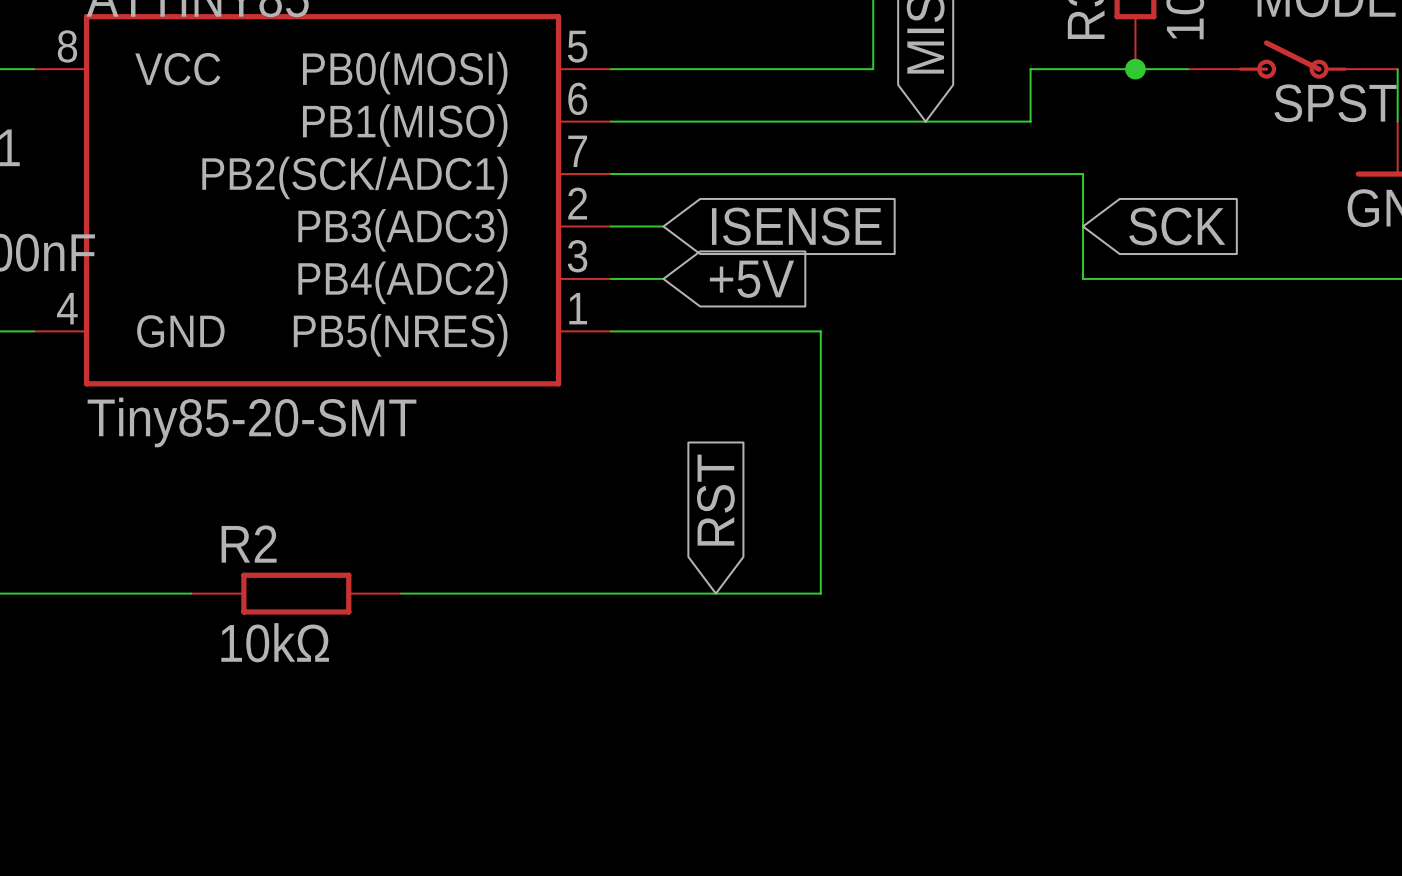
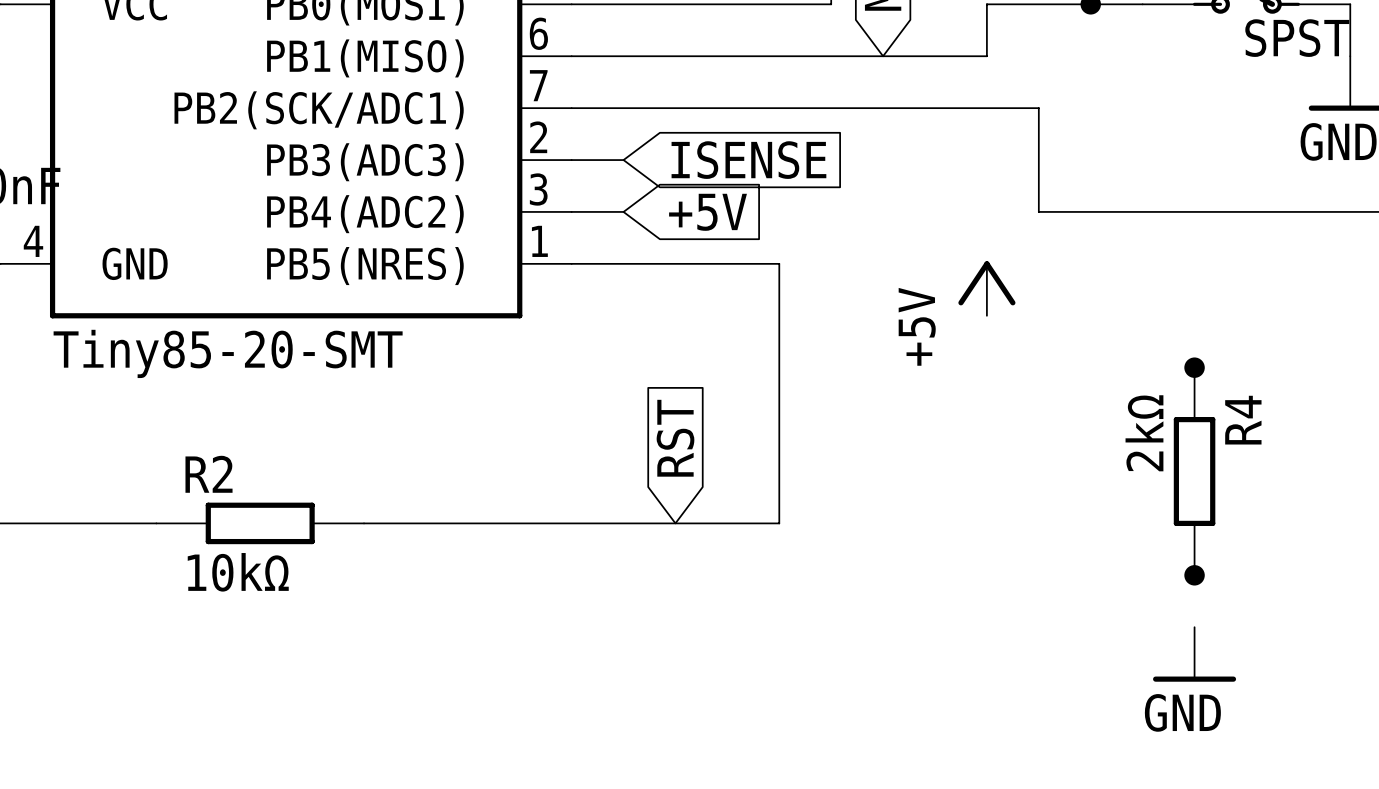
global label: SCK (1177, 226) -> none
power symbol: none -> +5V (986, 288)
junction: none -> (1194, 367)
R4: none -> 2kΩ (1194, 471)
junction: none -> (1194, 575)
power symbol: none -> GND (1194, 654)

